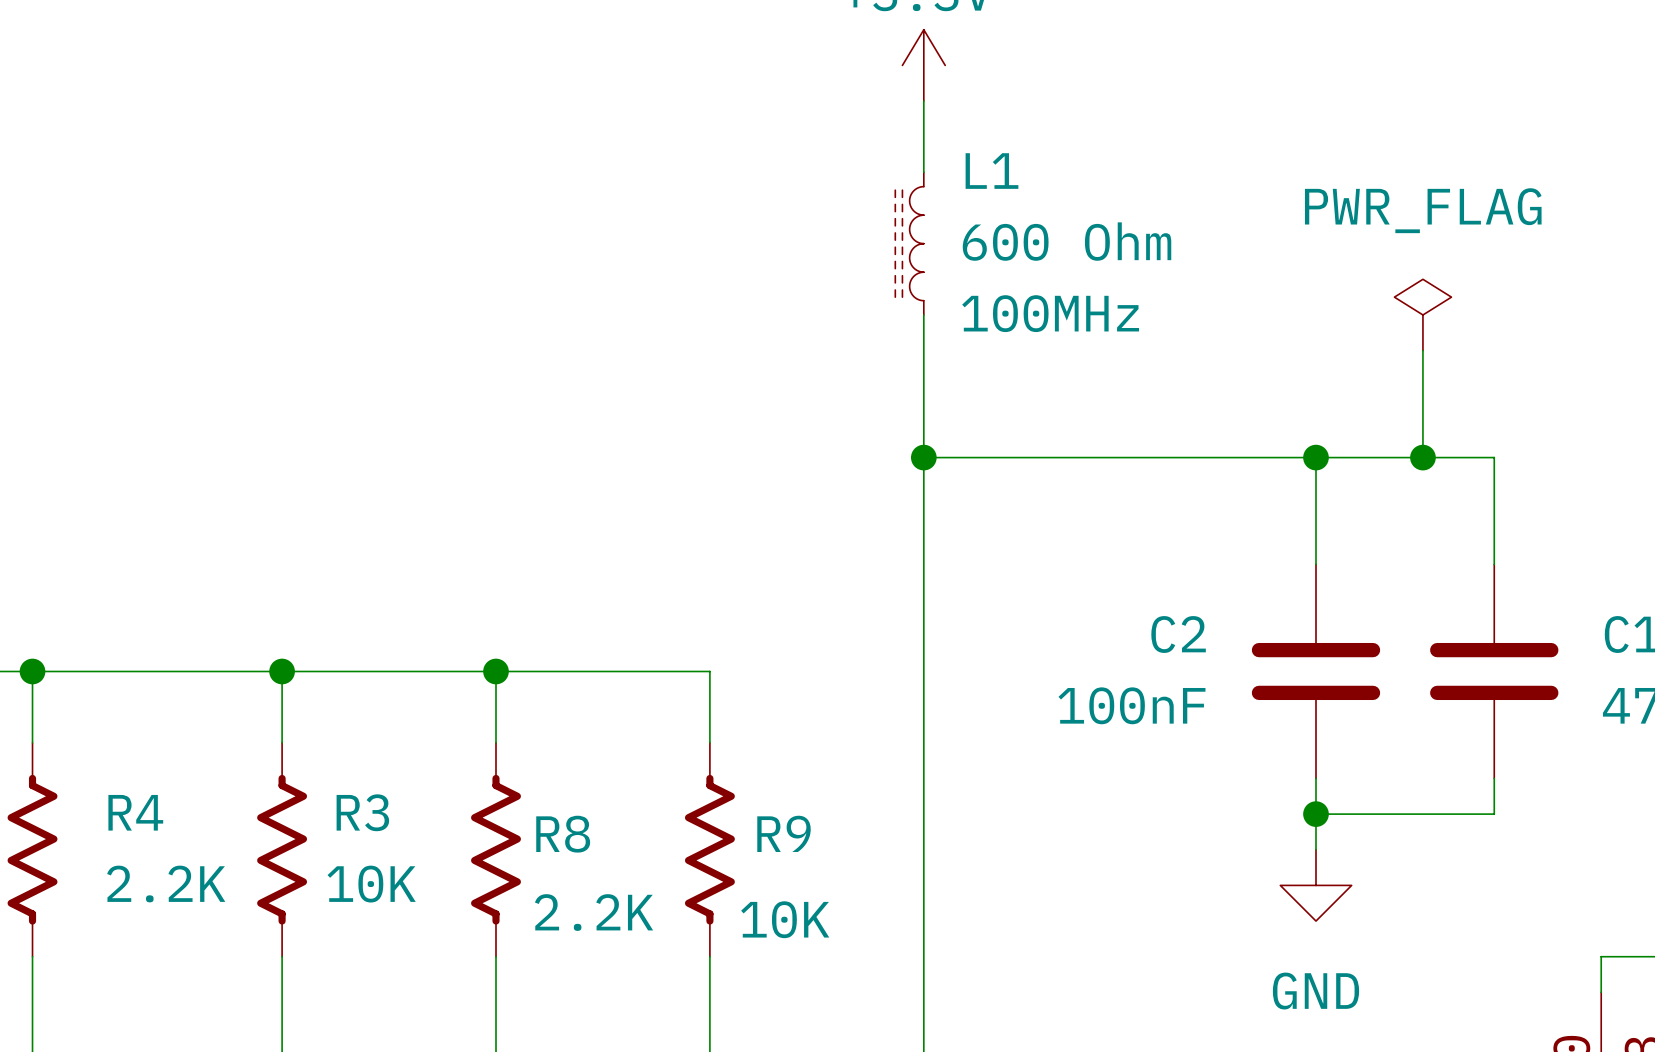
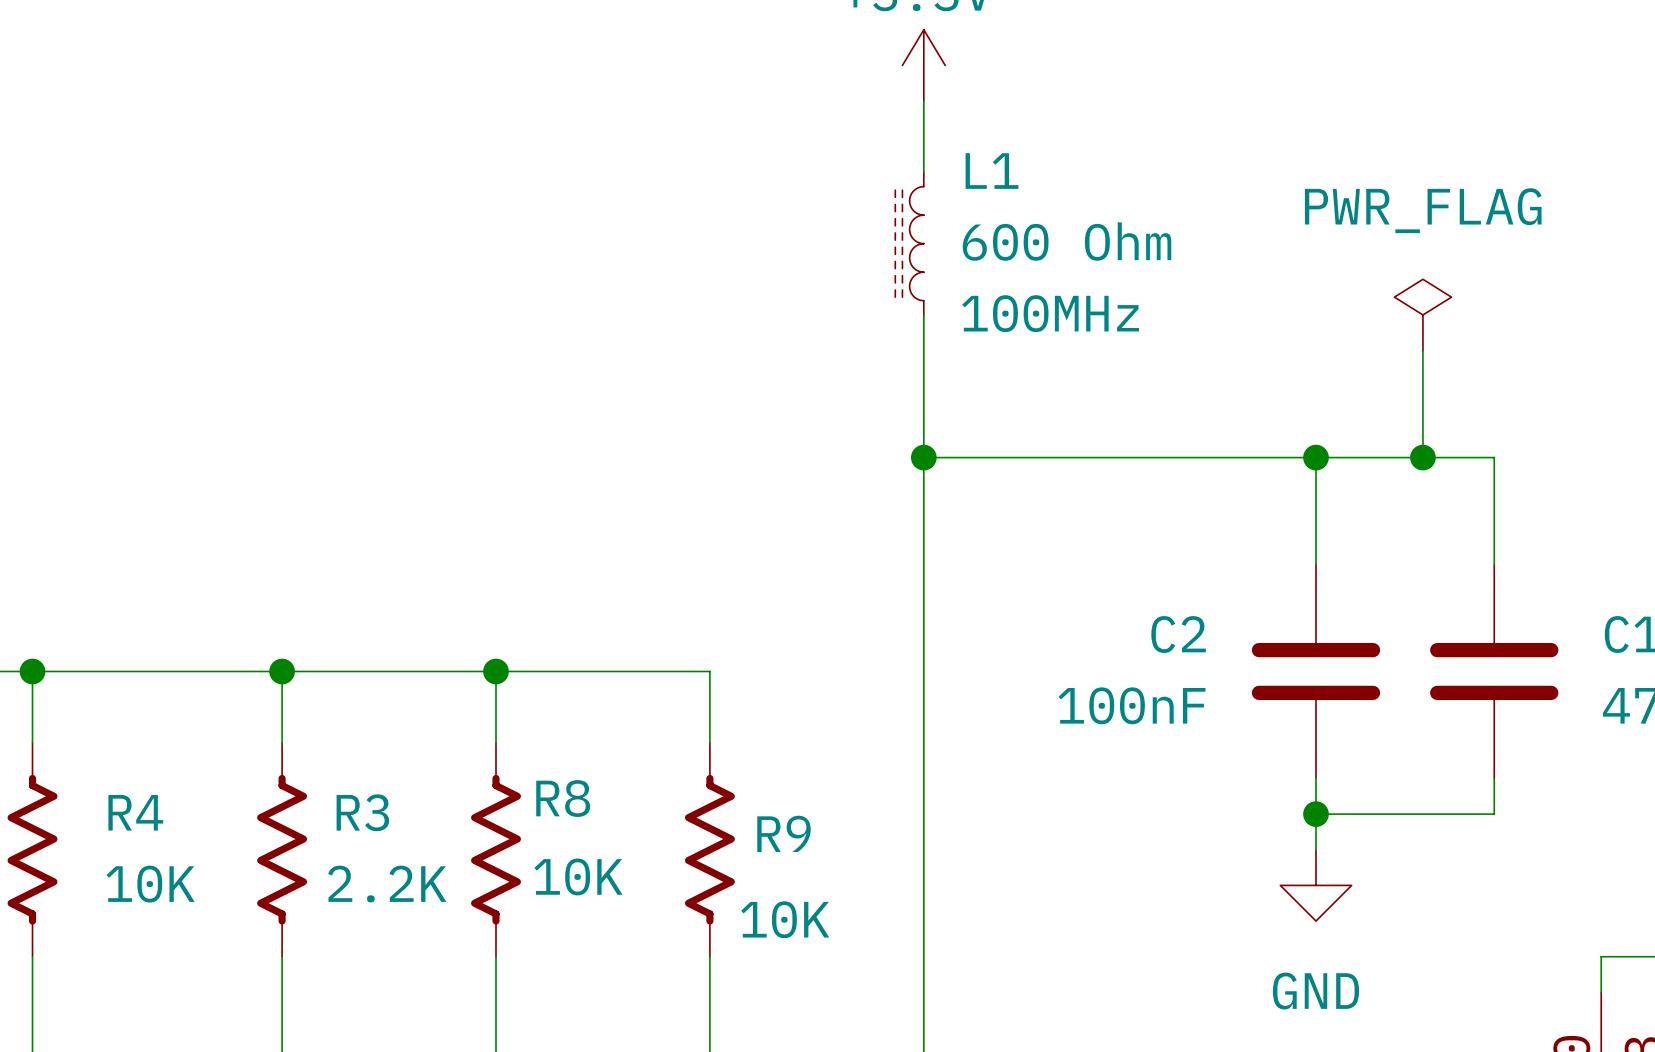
R8 name position: R8 (563, 834) -> R8 (563, 798)
R4 value: 2.2K (166, 884) -> 10K (150, 884)
R3 value: 10K (371, 884) -> 2.2K (387, 884)
R8 value: 2.2K (594, 912) -> 10K (578, 876)

